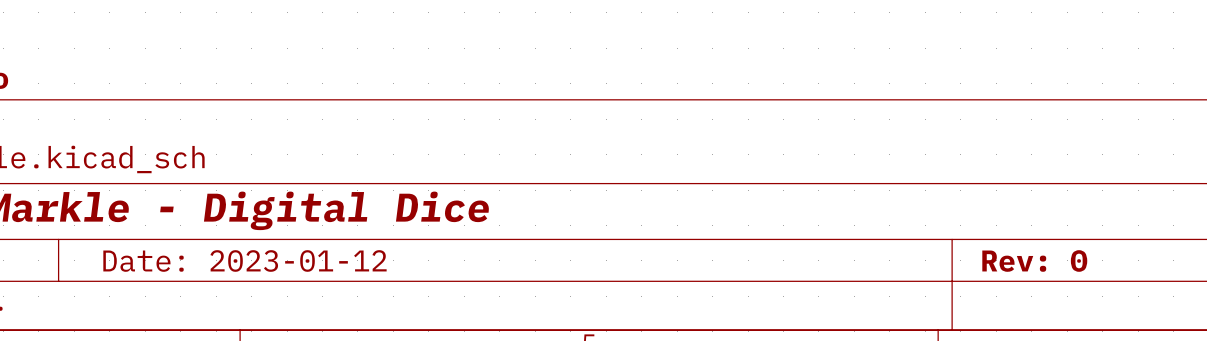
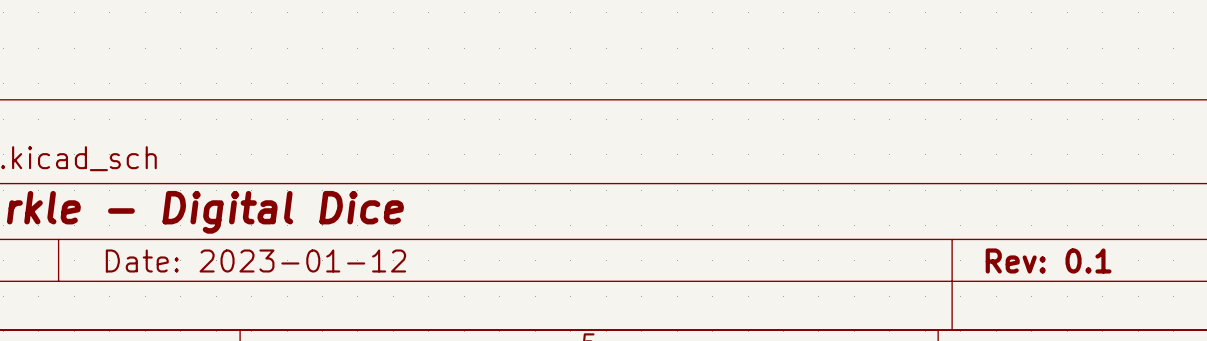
title block: Rev: 0 (1034, 260) -> Rev: 0.1 (1048, 260)

